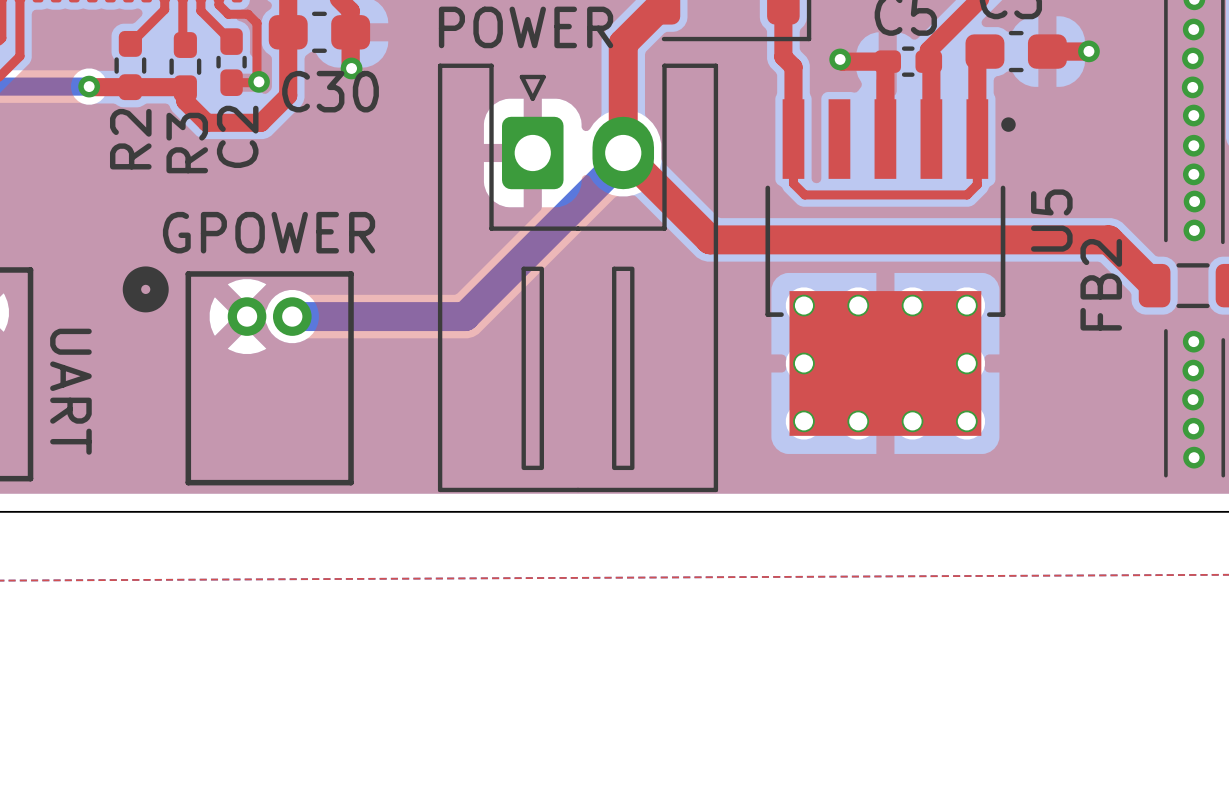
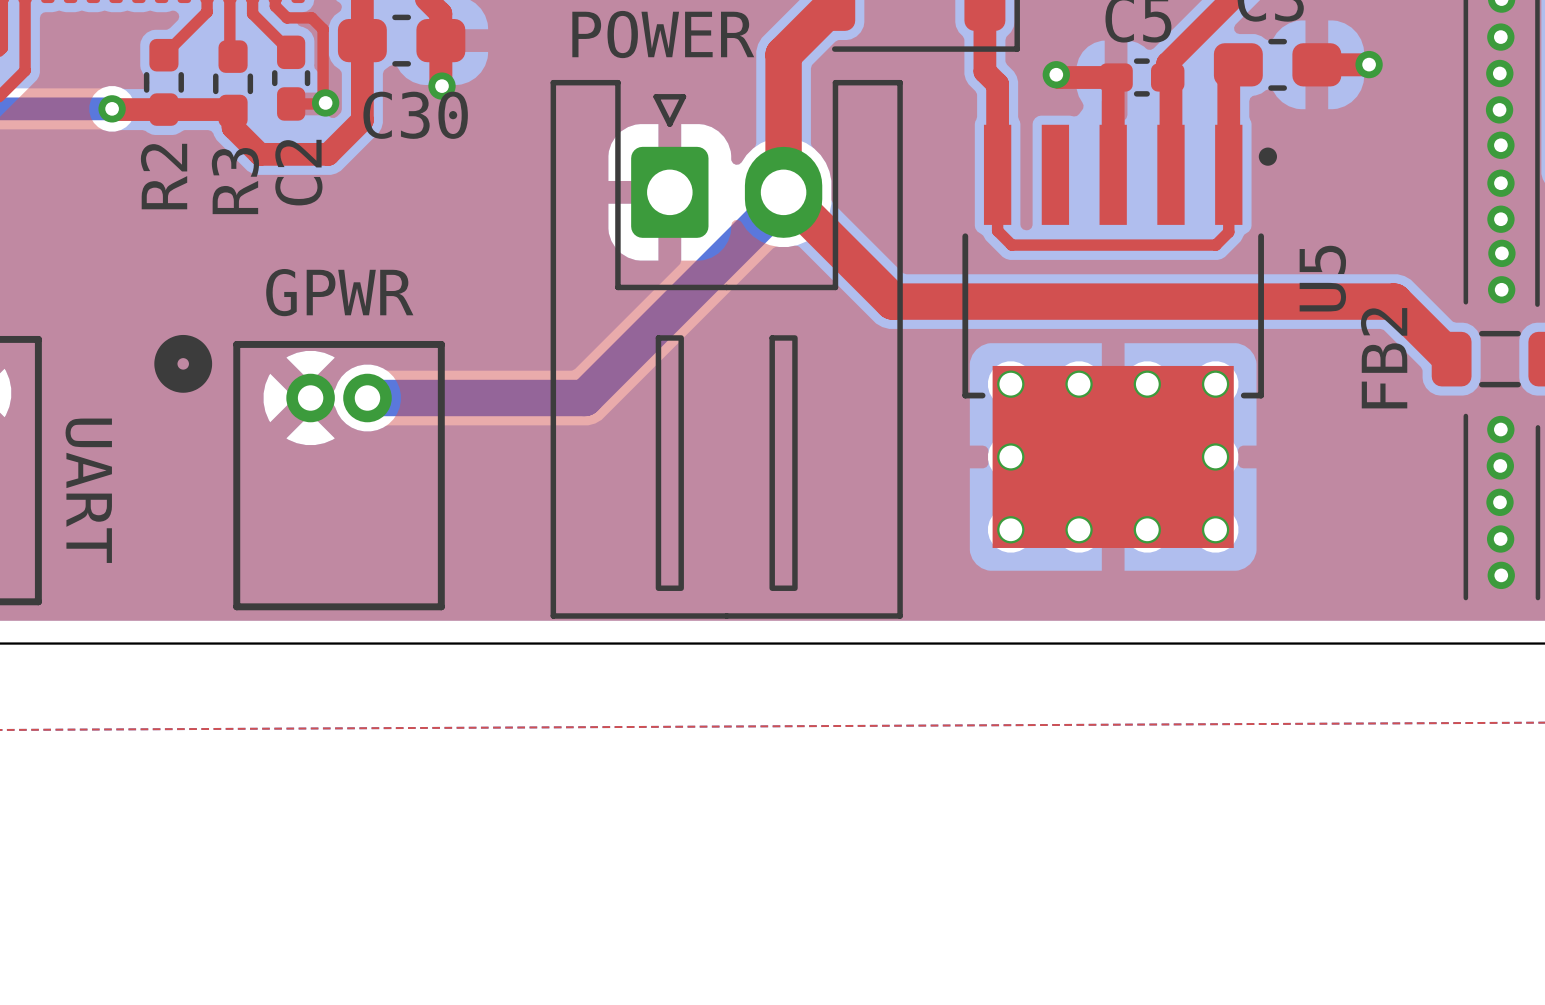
GPOWER name: GPOWER (269, 232) -> GPWR (339, 292)

